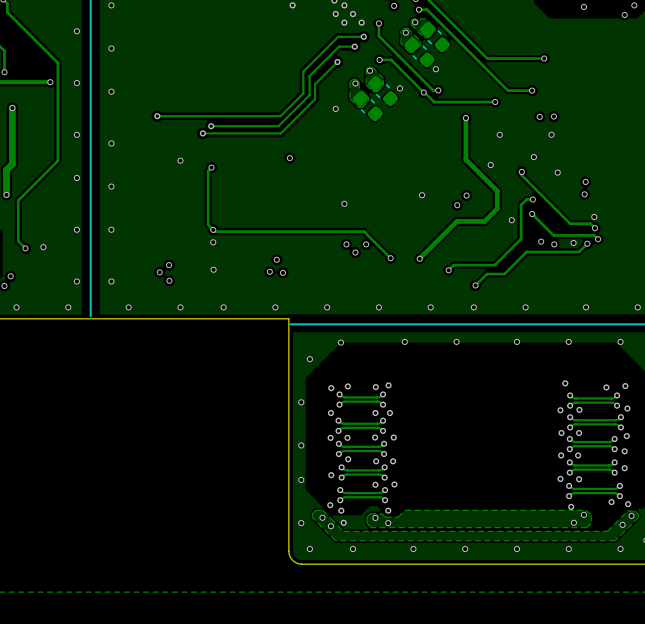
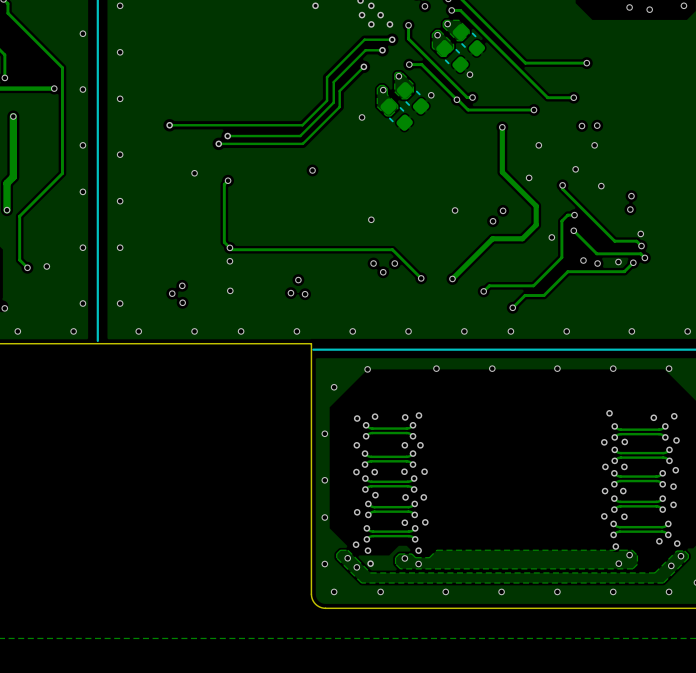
via: none -> (649, 9)
via: (624, 15) -> none
via: (10, 276) -> none

